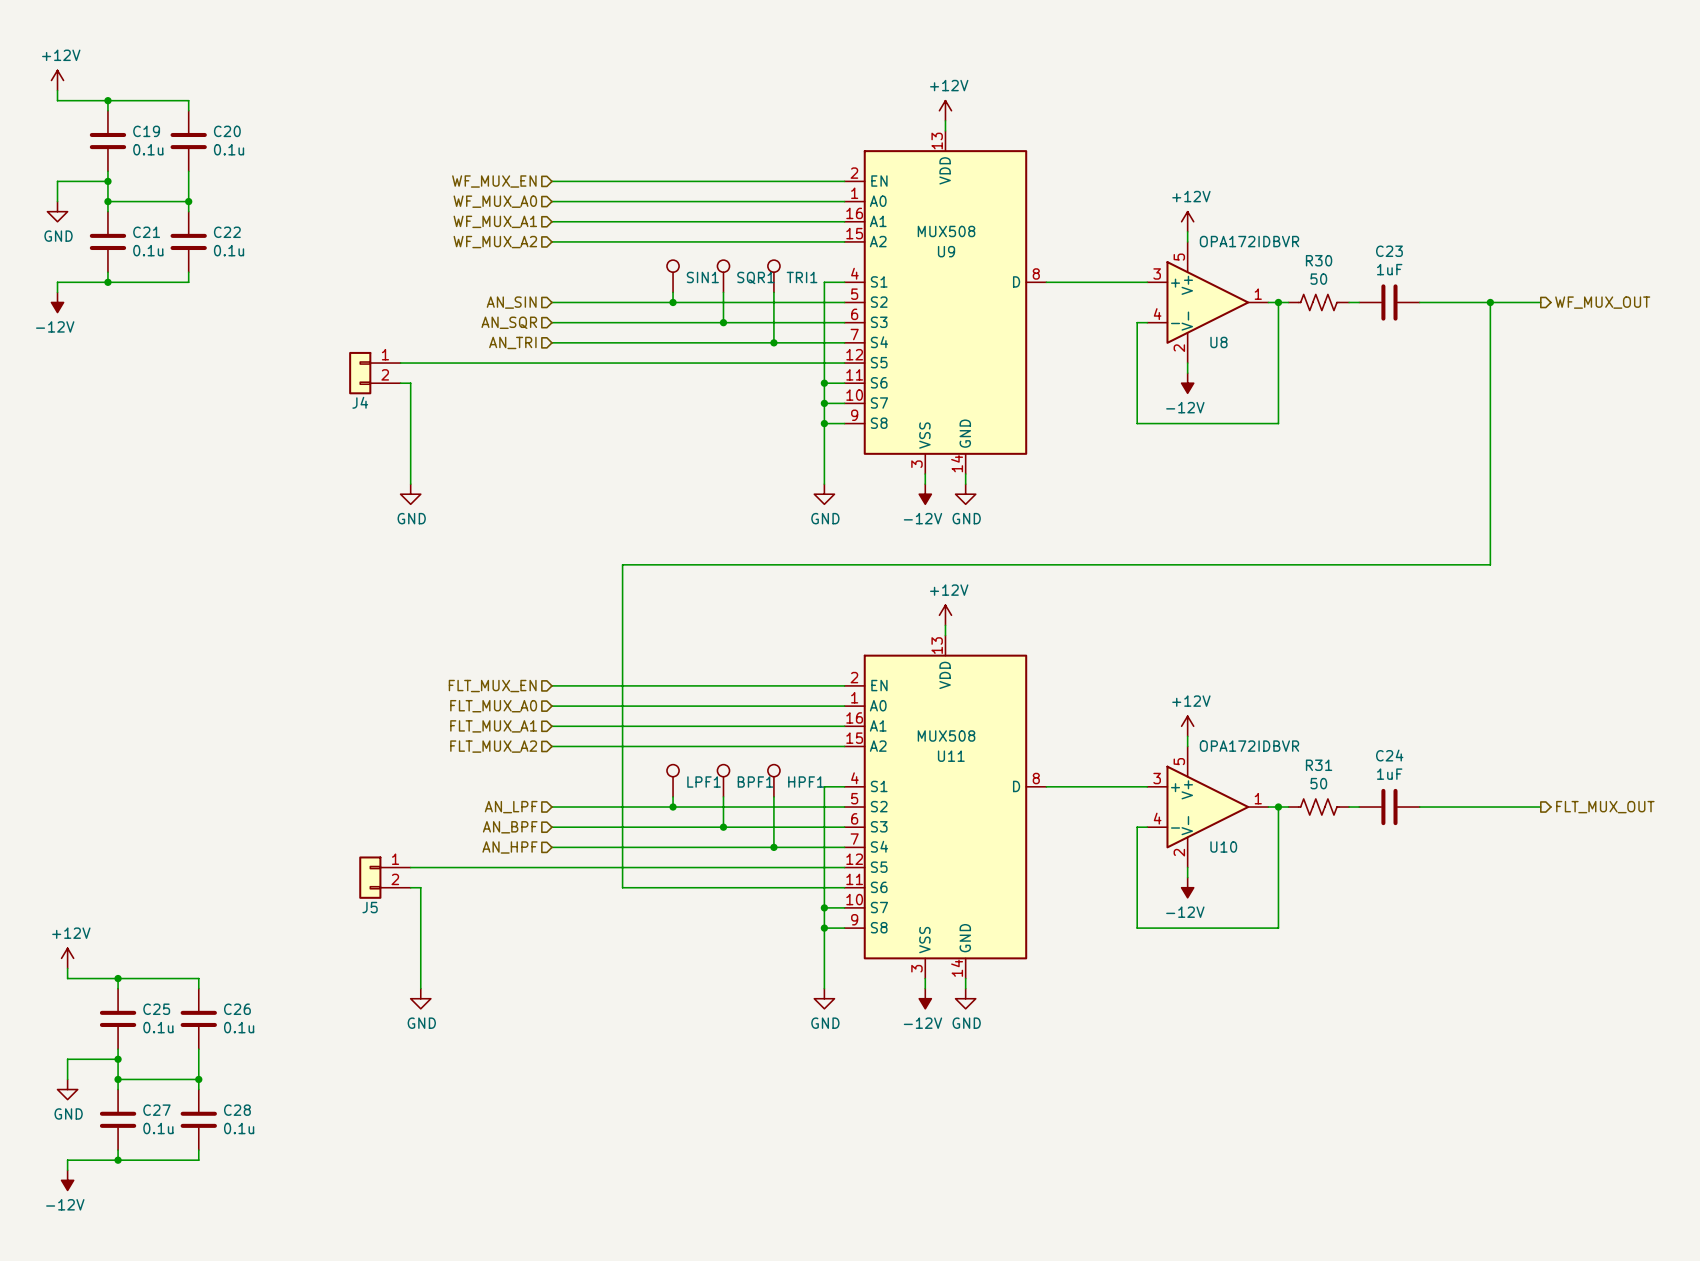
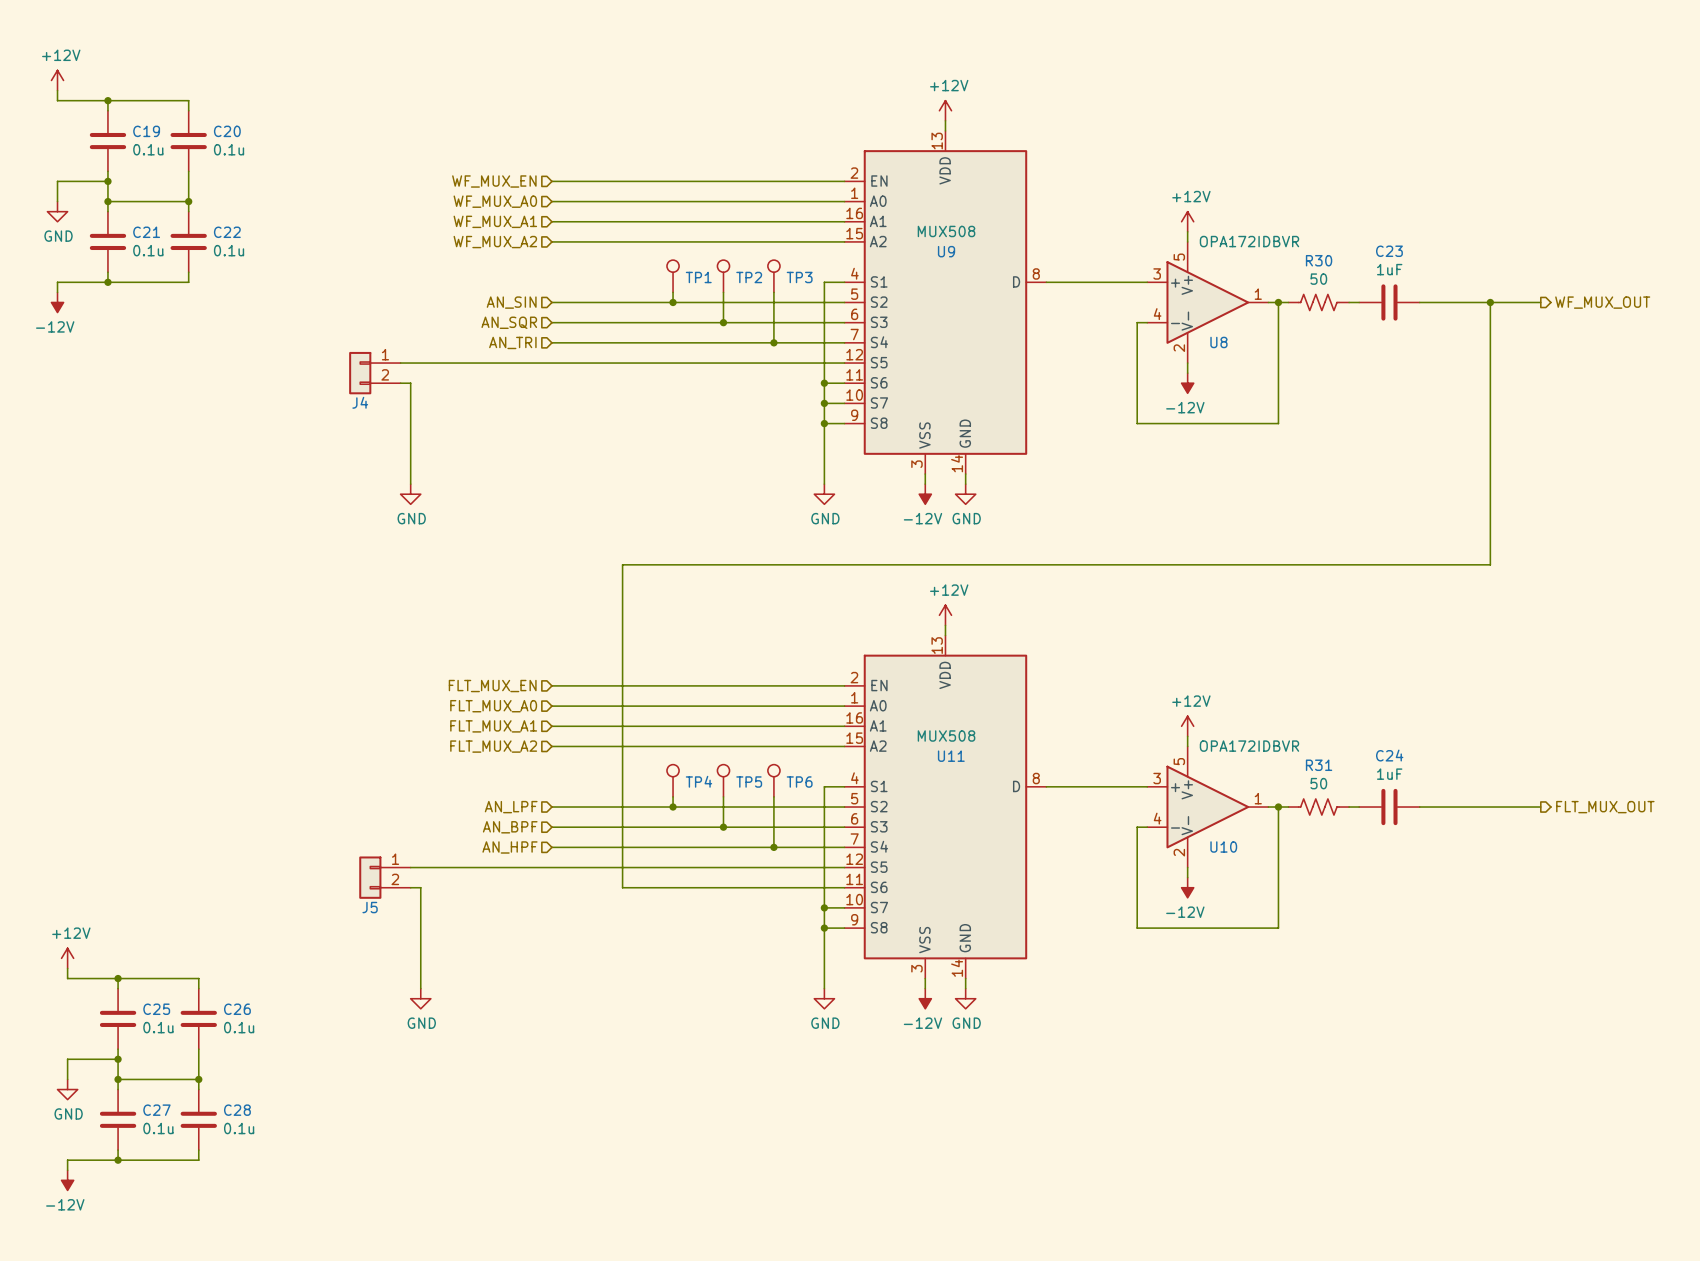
SIN1 name: SIN1 (702, 277) -> TP1 (698, 277)
SQR1 name: SQR1 (755, 277) -> TP2 (749, 277)
TRI1 name: TRI1 (802, 277) -> TP3 (799, 277)
LPF1 name: LPF1 (704, 782) -> TP4 (698, 781)
BPF1 name: BPF1 (755, 782) -> TP5 (749, 782)
HPF1 name: HPF1 (806, 782) -> TP6 (799, 782)

